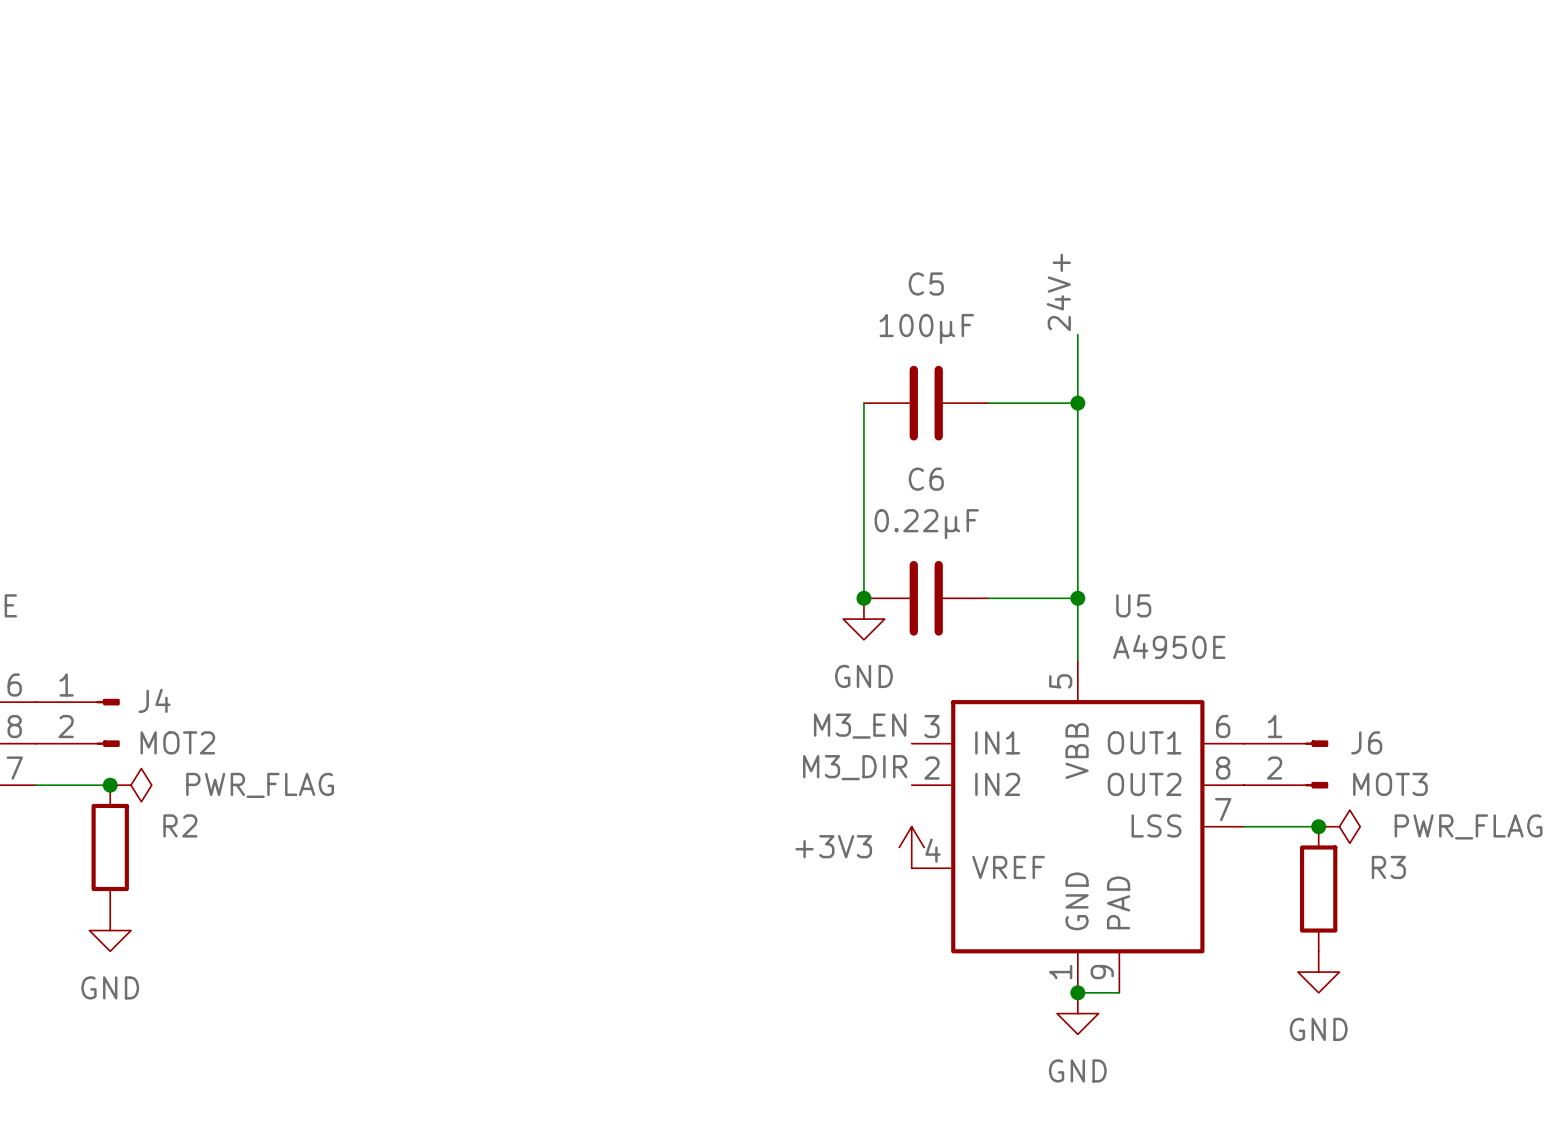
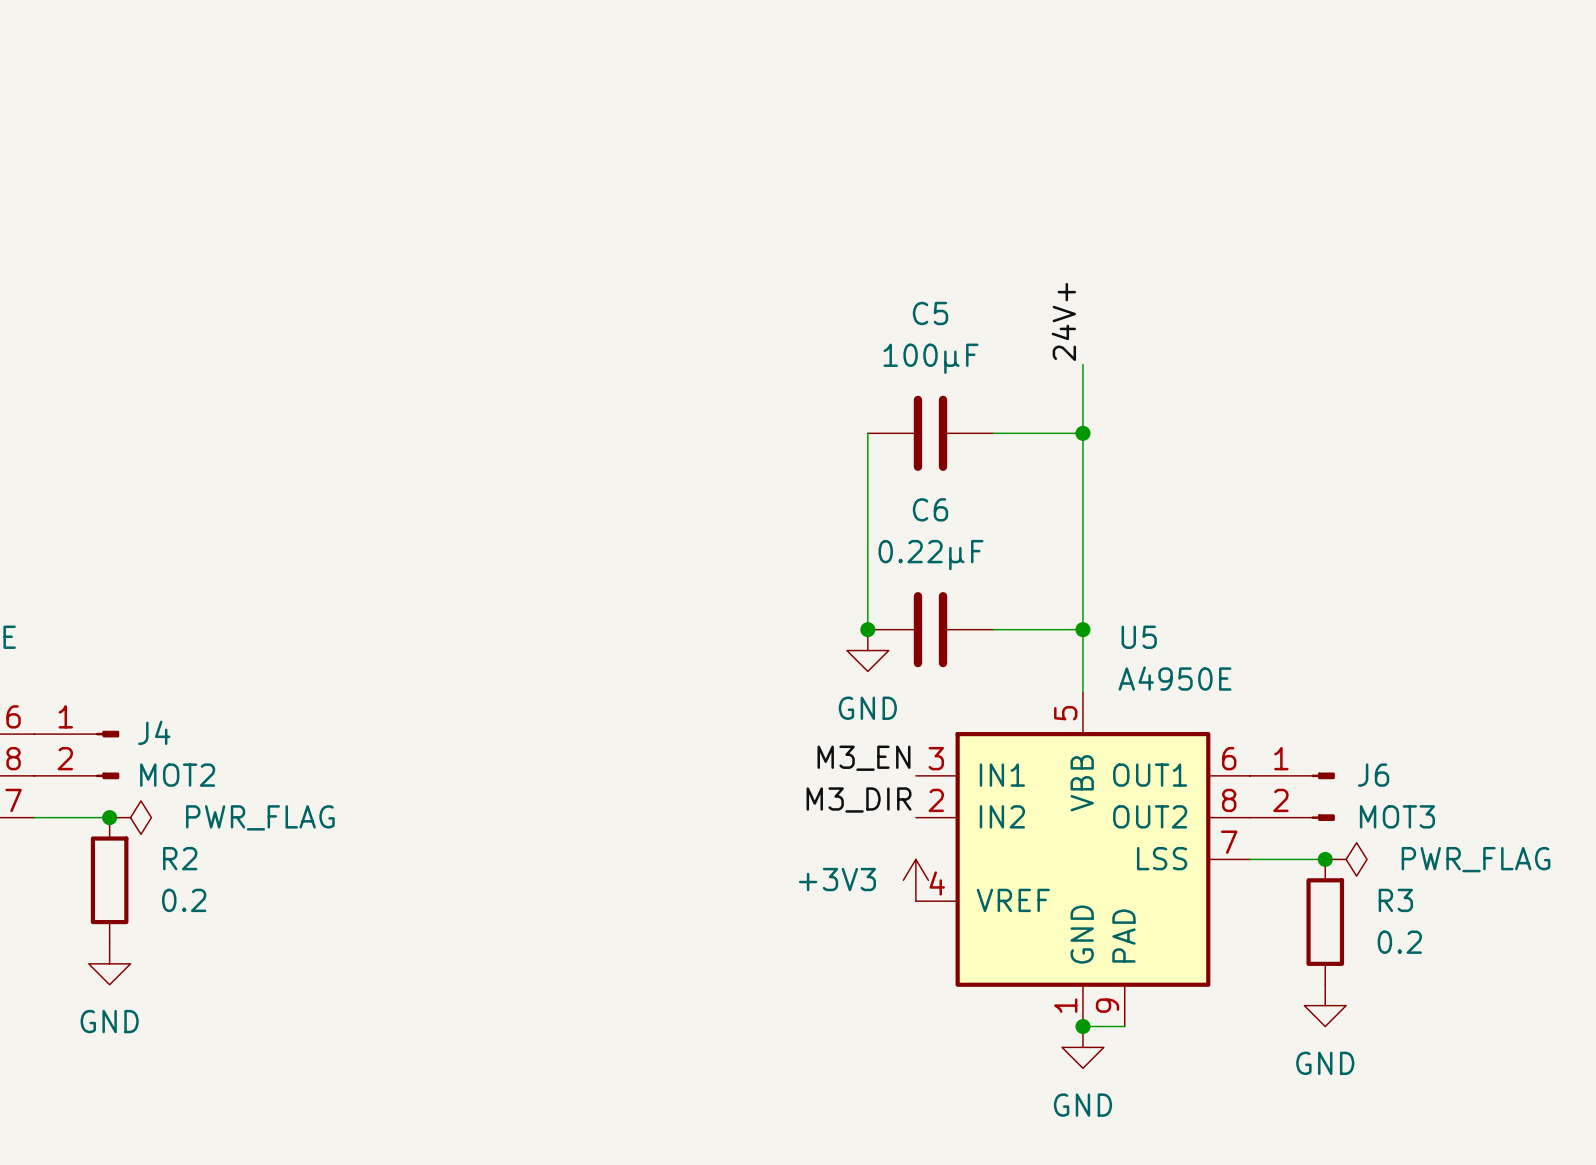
R2 value: none -> 0.2 (184, 900)
R3 value: none -> 0.2 (1399, 942)

